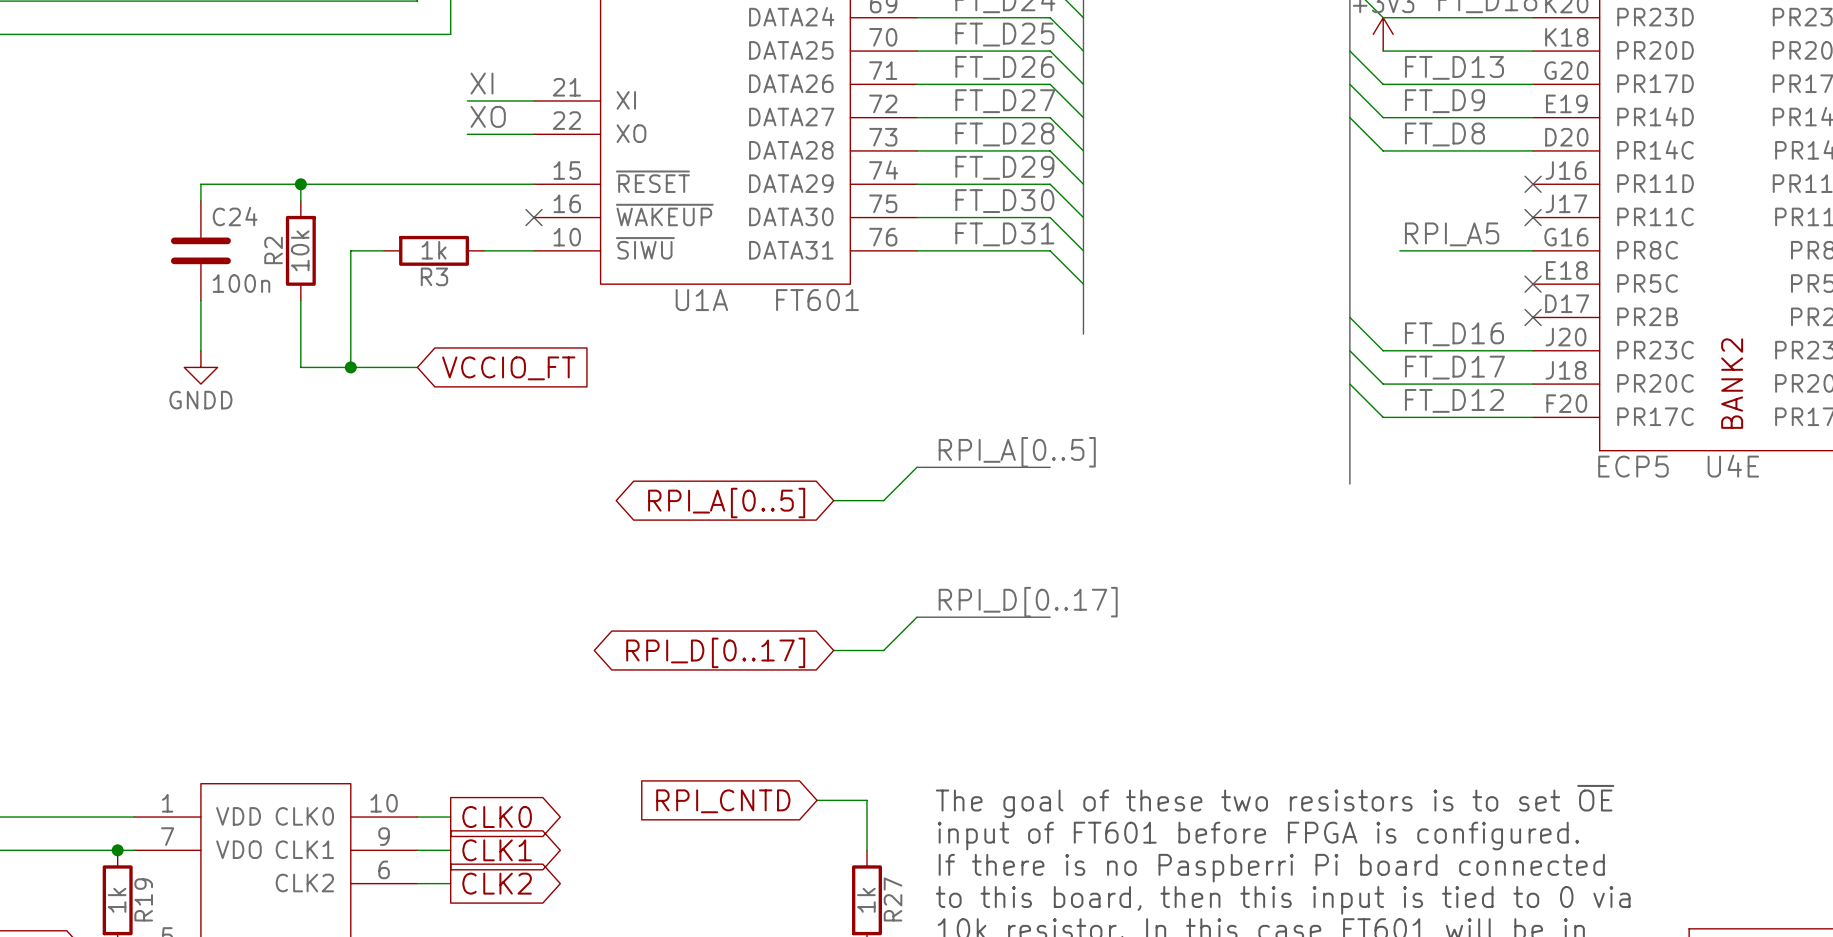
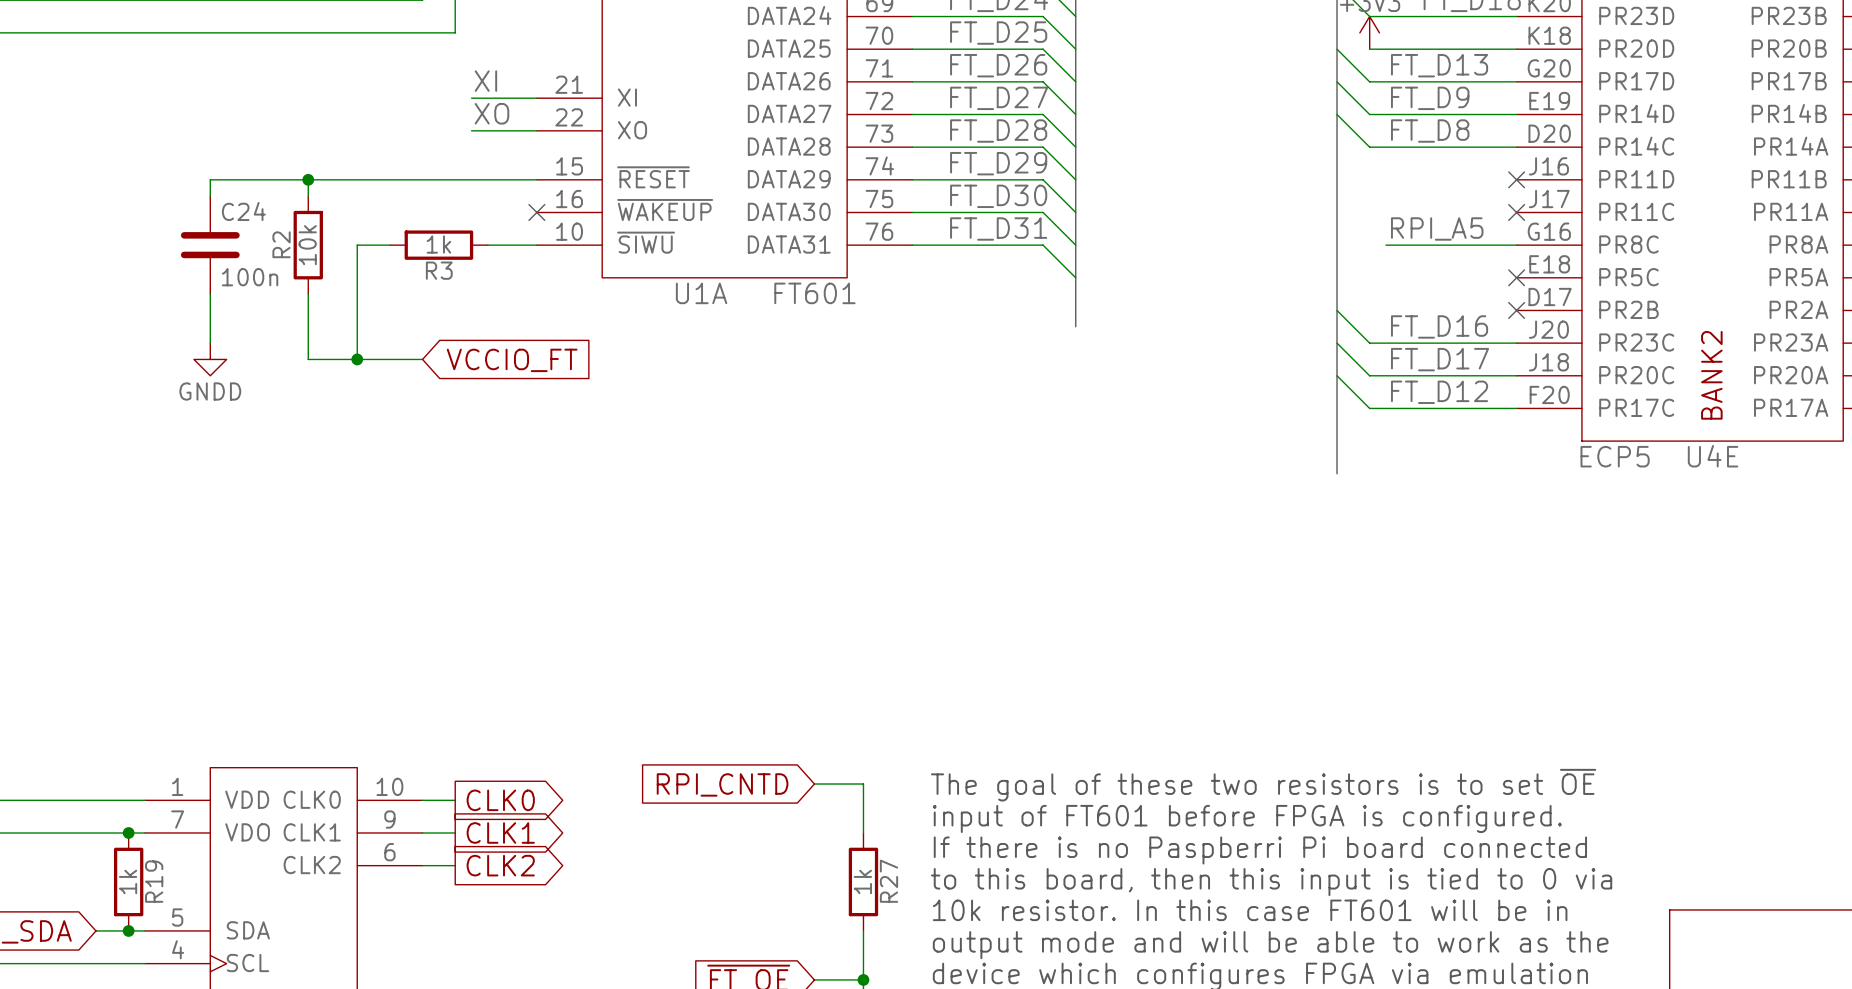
label: RPI_A[0..5] (1017, 452) -> none
wire: (916, 467) (883, 500) (833, 500) -> none
bus: (916, 467) (1050, 467) -> none
global label: RPI_A[0..5] (726, 503) -> none
label: RPI_D[0..17] (1028, 602) -> none
wire: (916, 617) (883, 650) (833, 650) -> none
bus: (916, 617) (1050, 617) -> none
global label: RPI_D[0..17] (715, 652) -> none

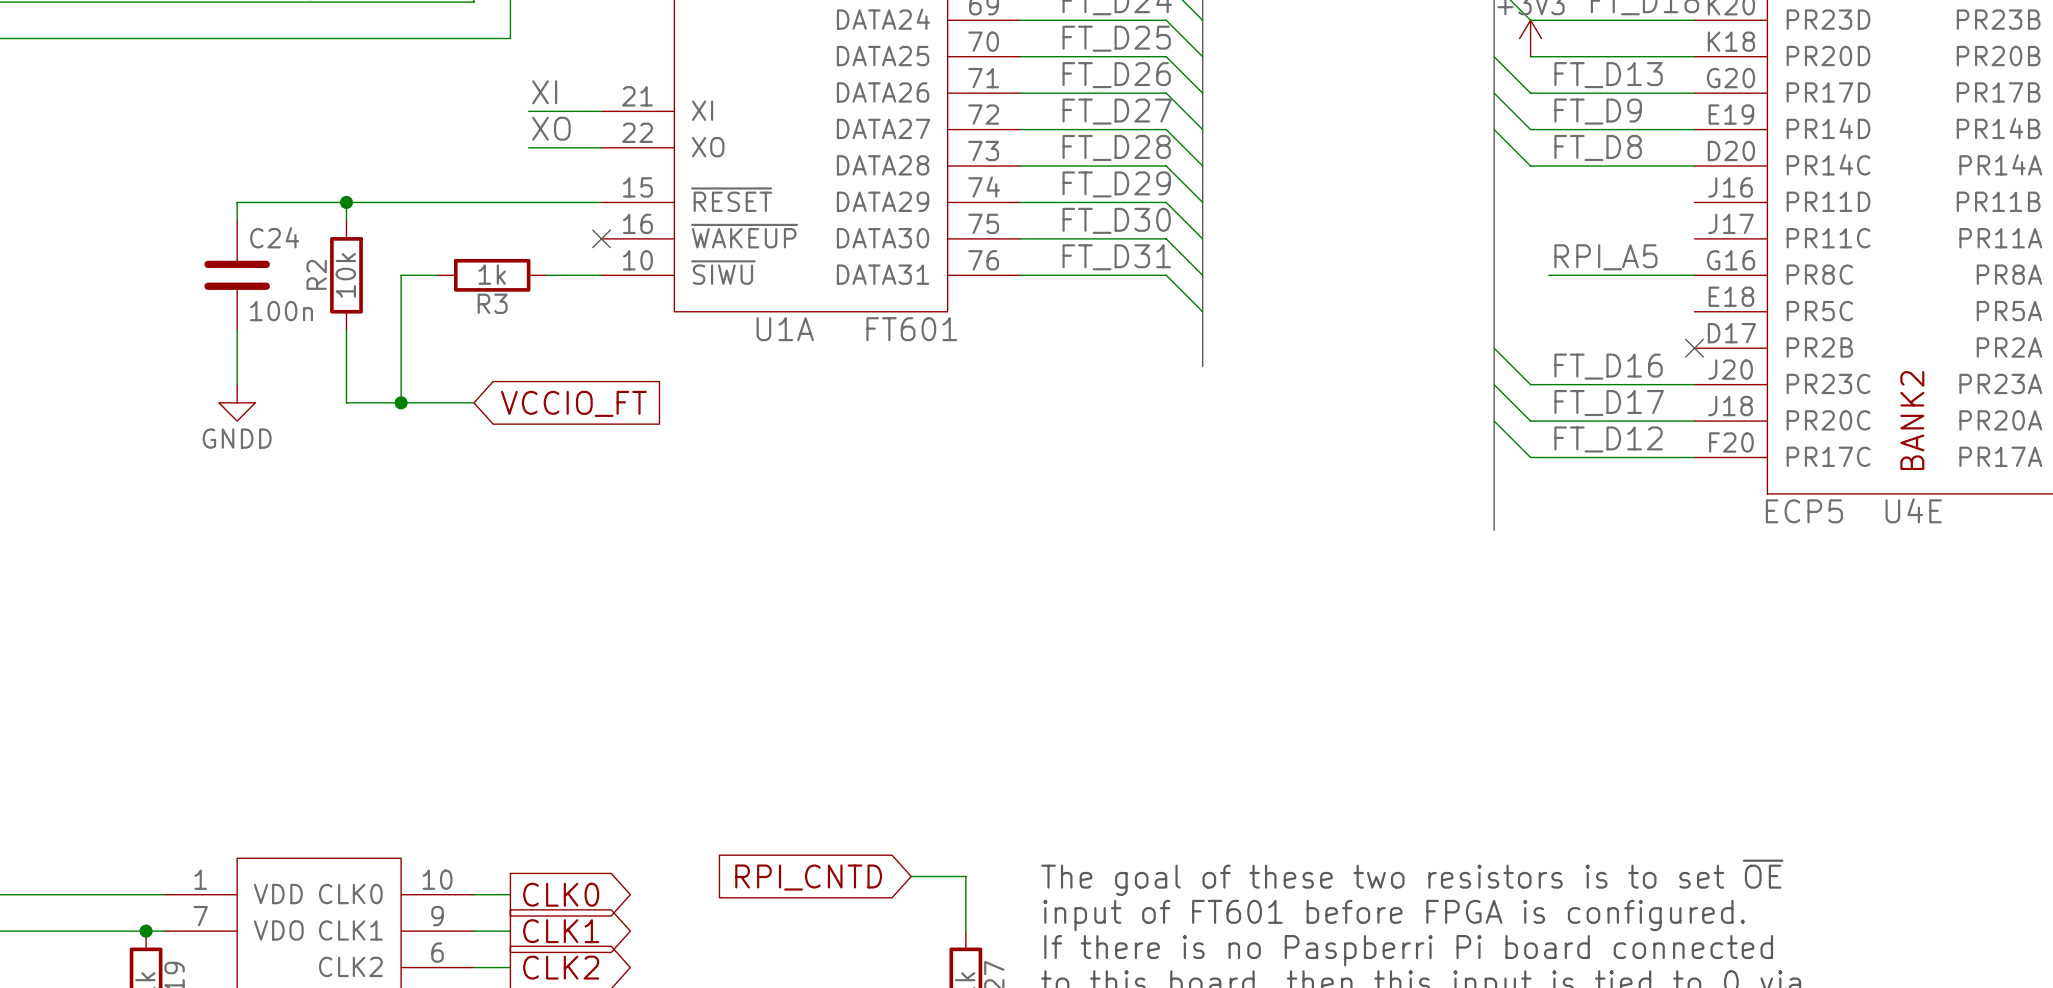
no-connect mark: (1516, 179) -> none
no-connect mark: (1516, 212) -> none
no-connect mark: (1516, 277) -> none

